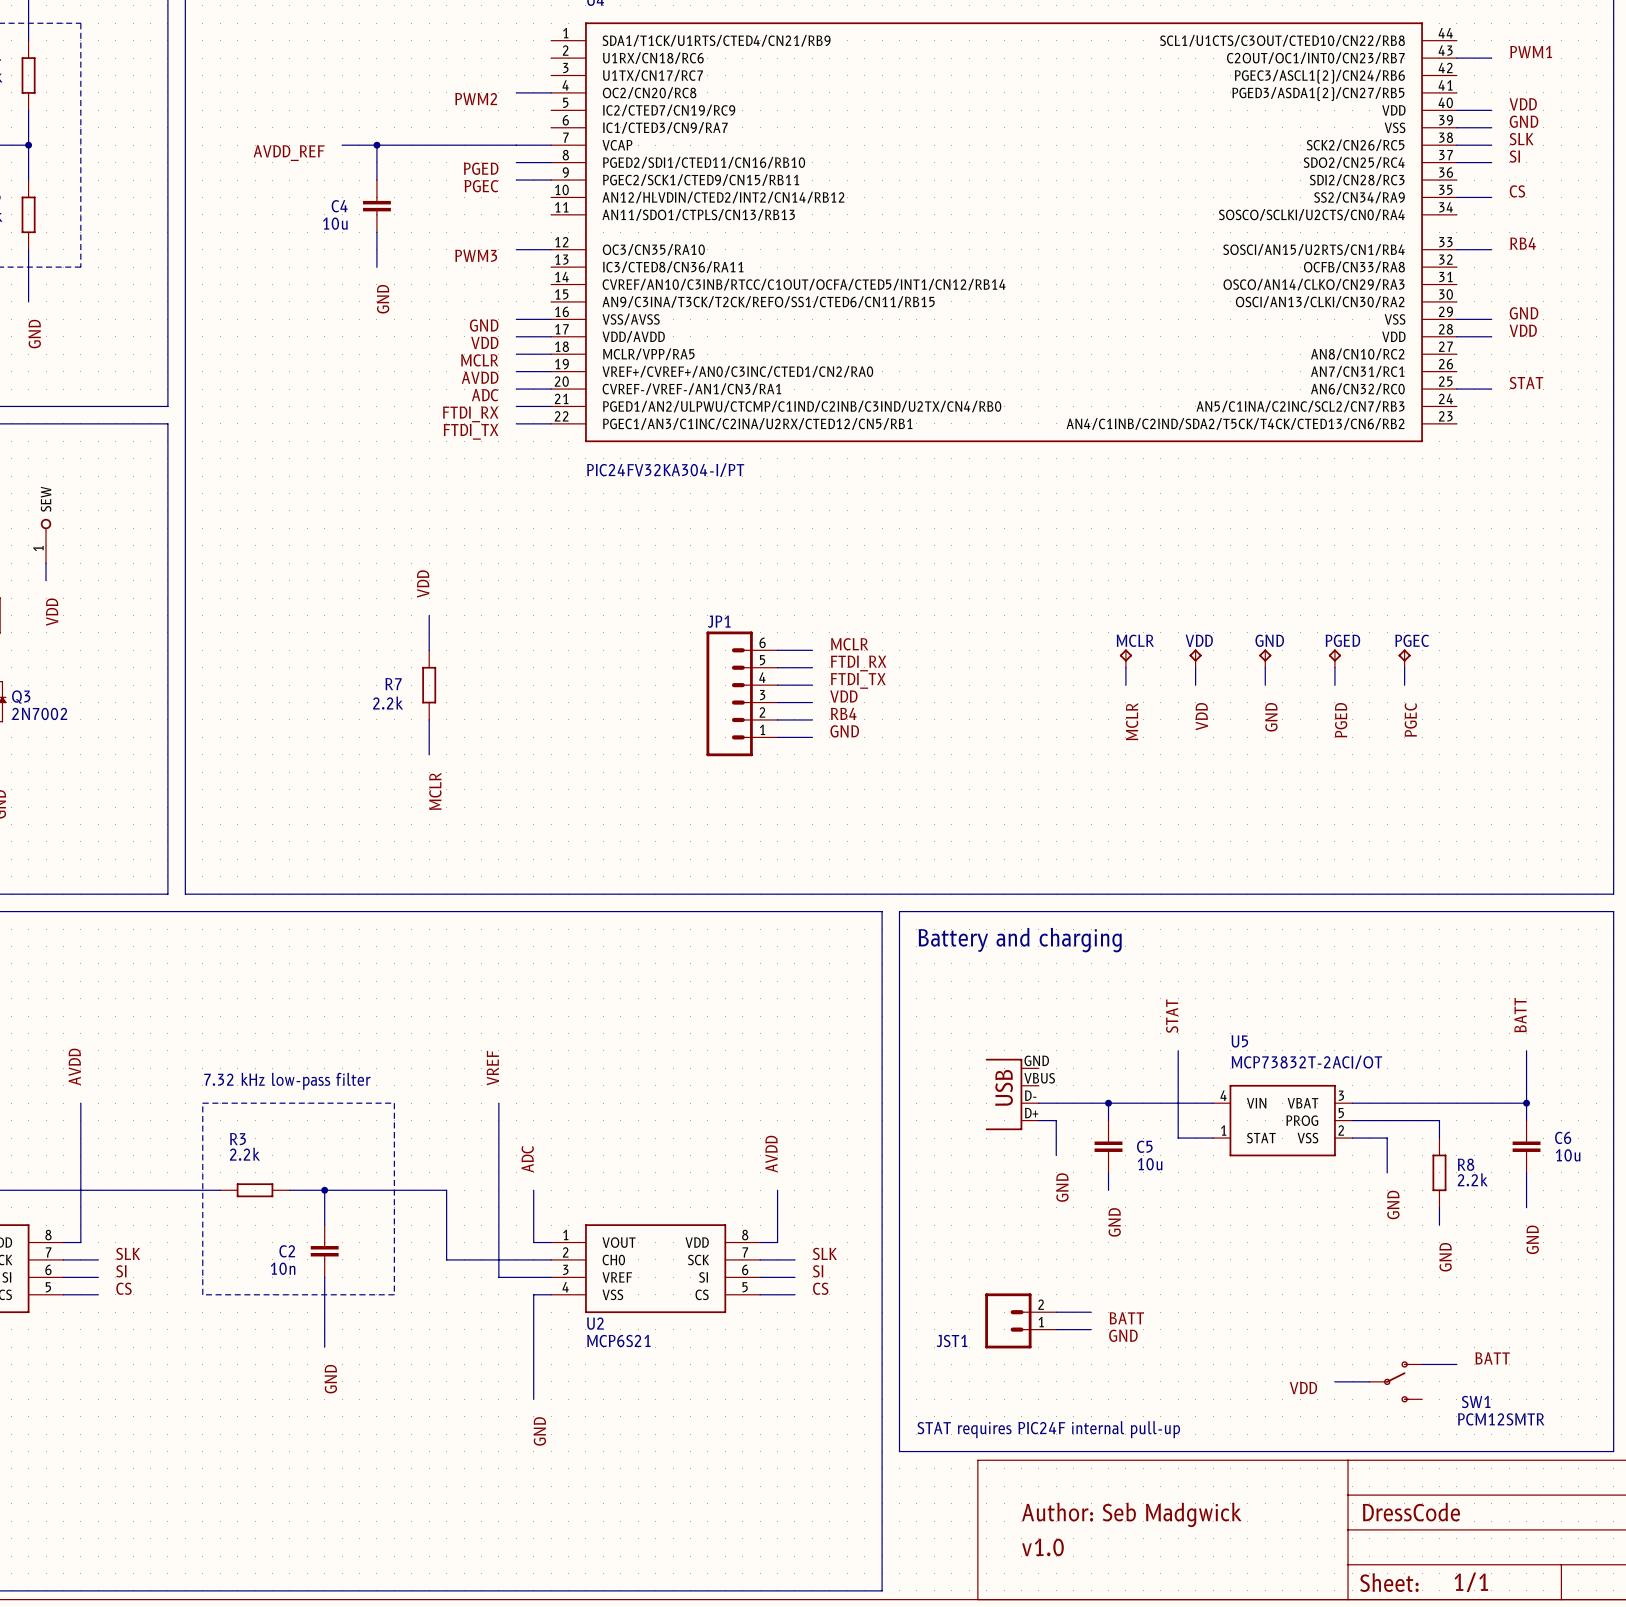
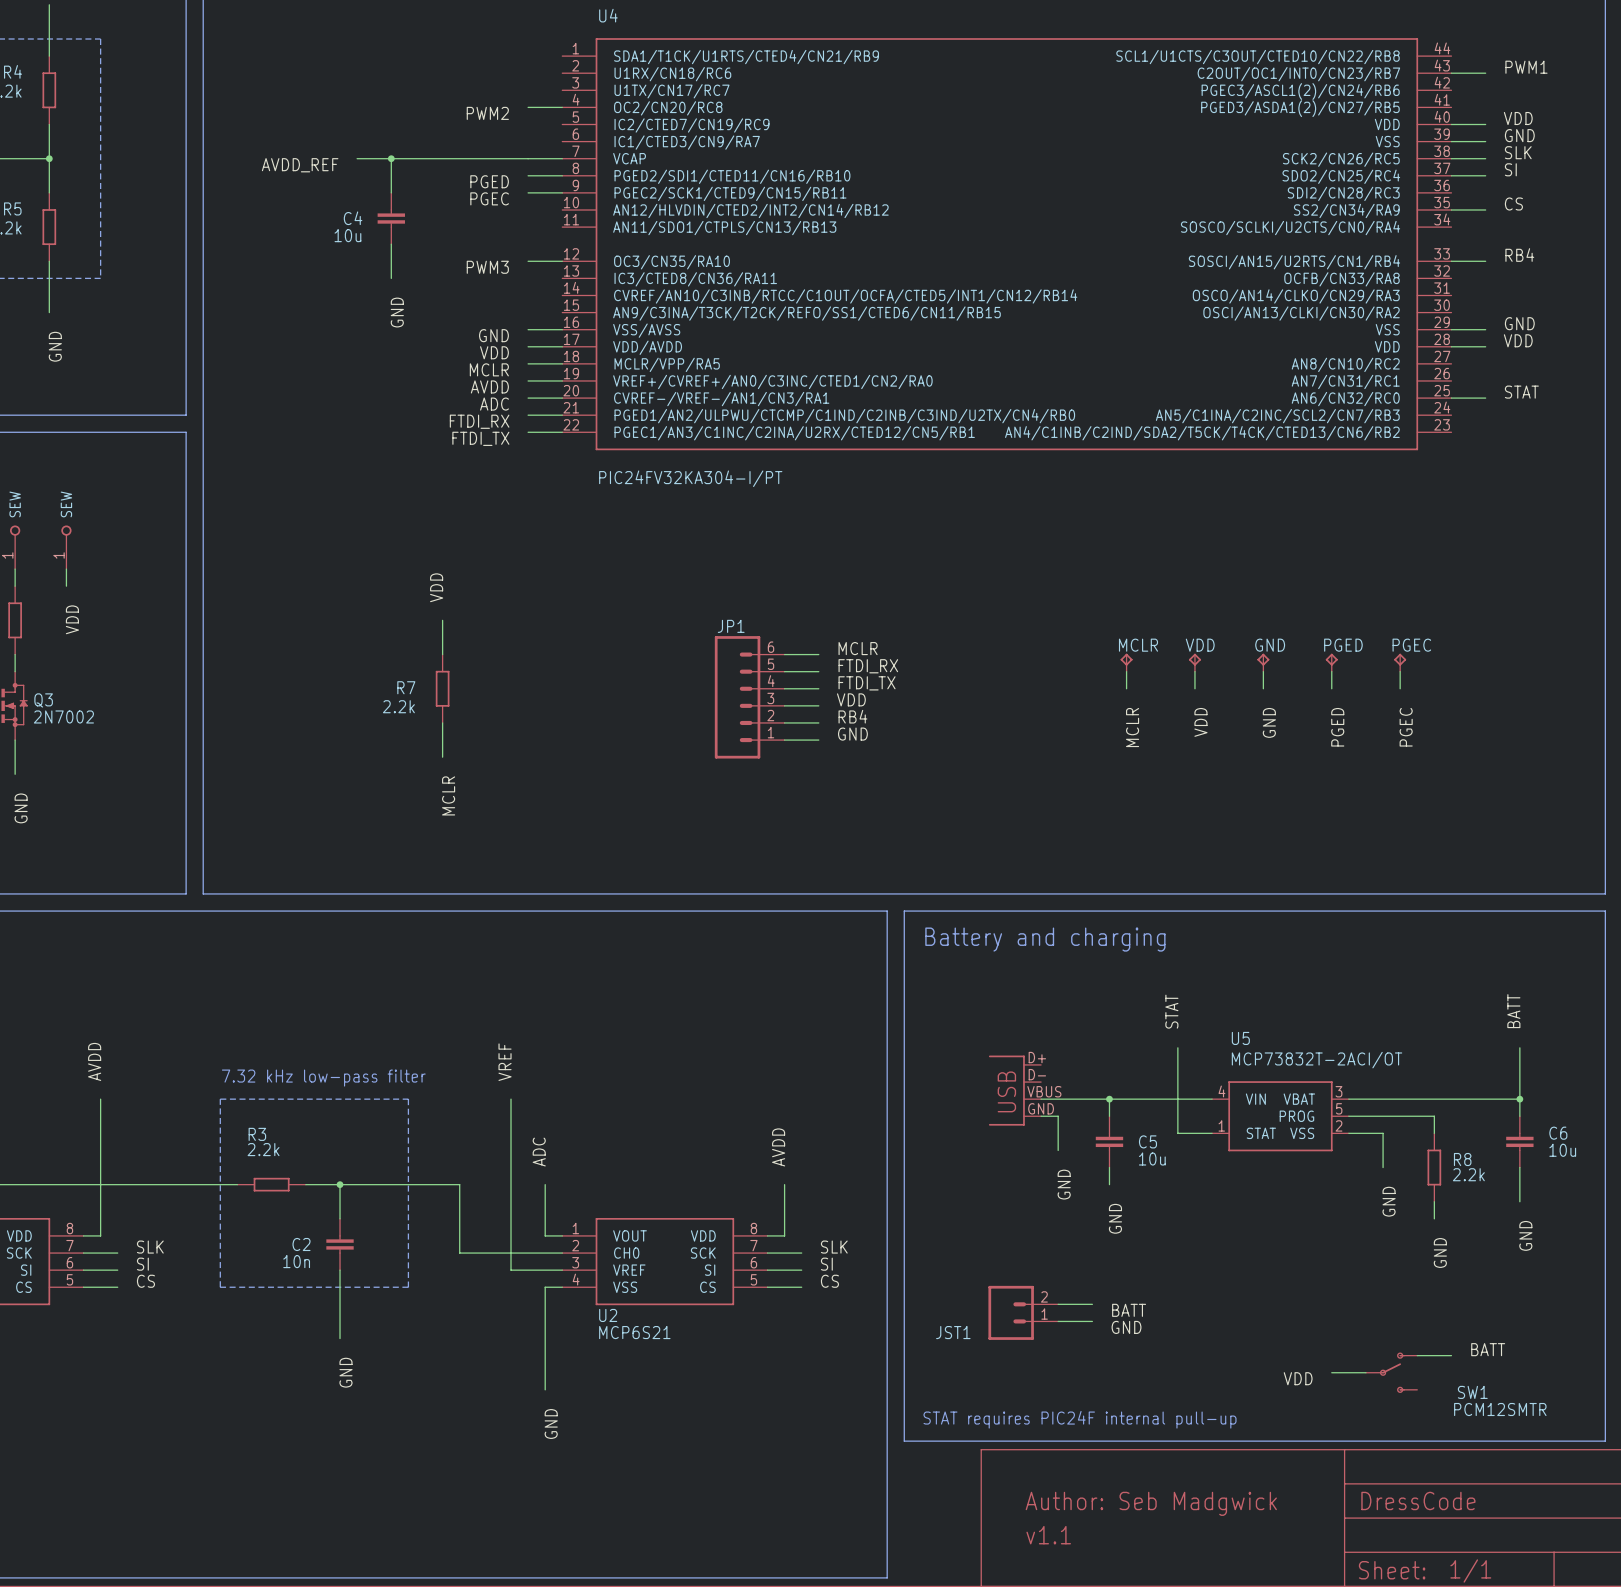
part flip: as is (1004, 1094) -> up-down (1006, 1090)
text: v1.0 (1042, 1547) -> v1.1 (1048, 1535)

